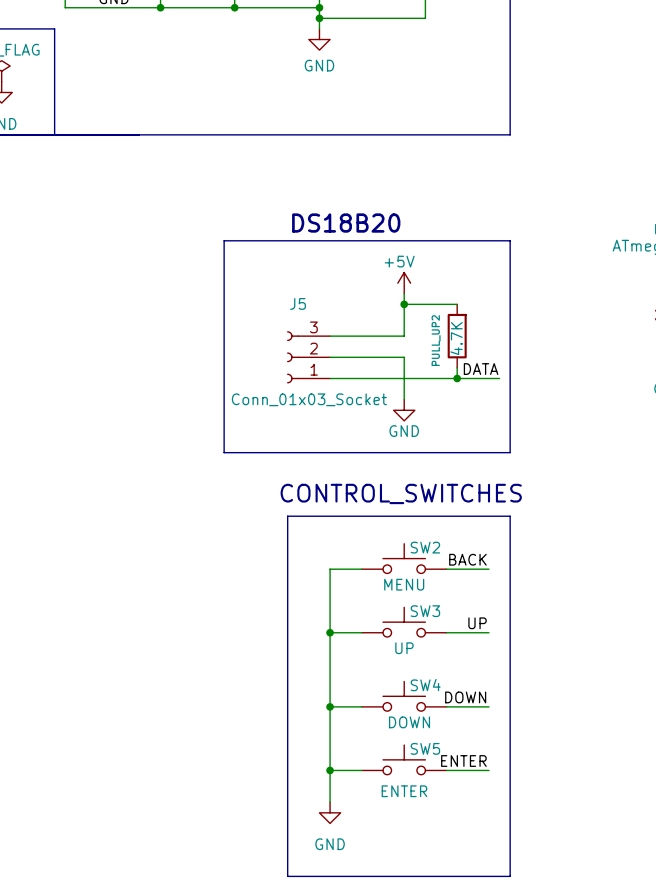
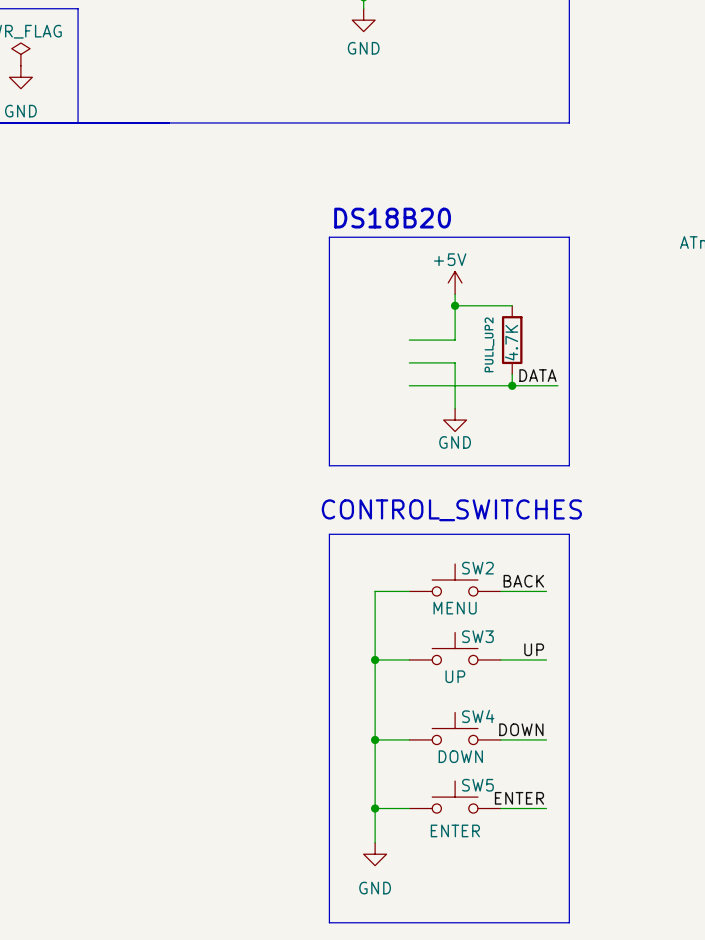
line: (287, 240) (224, 240) (224, 452) (287, 452) -> (329, 237) (329, 465)
wire: (330, 336) (361, 336) -> none
J5: Conn_01x03_Socket (308, 357) -> none
wire: (330, 357) (361, 357) -> none
wire: (330, 378) (361, 378) -> none

